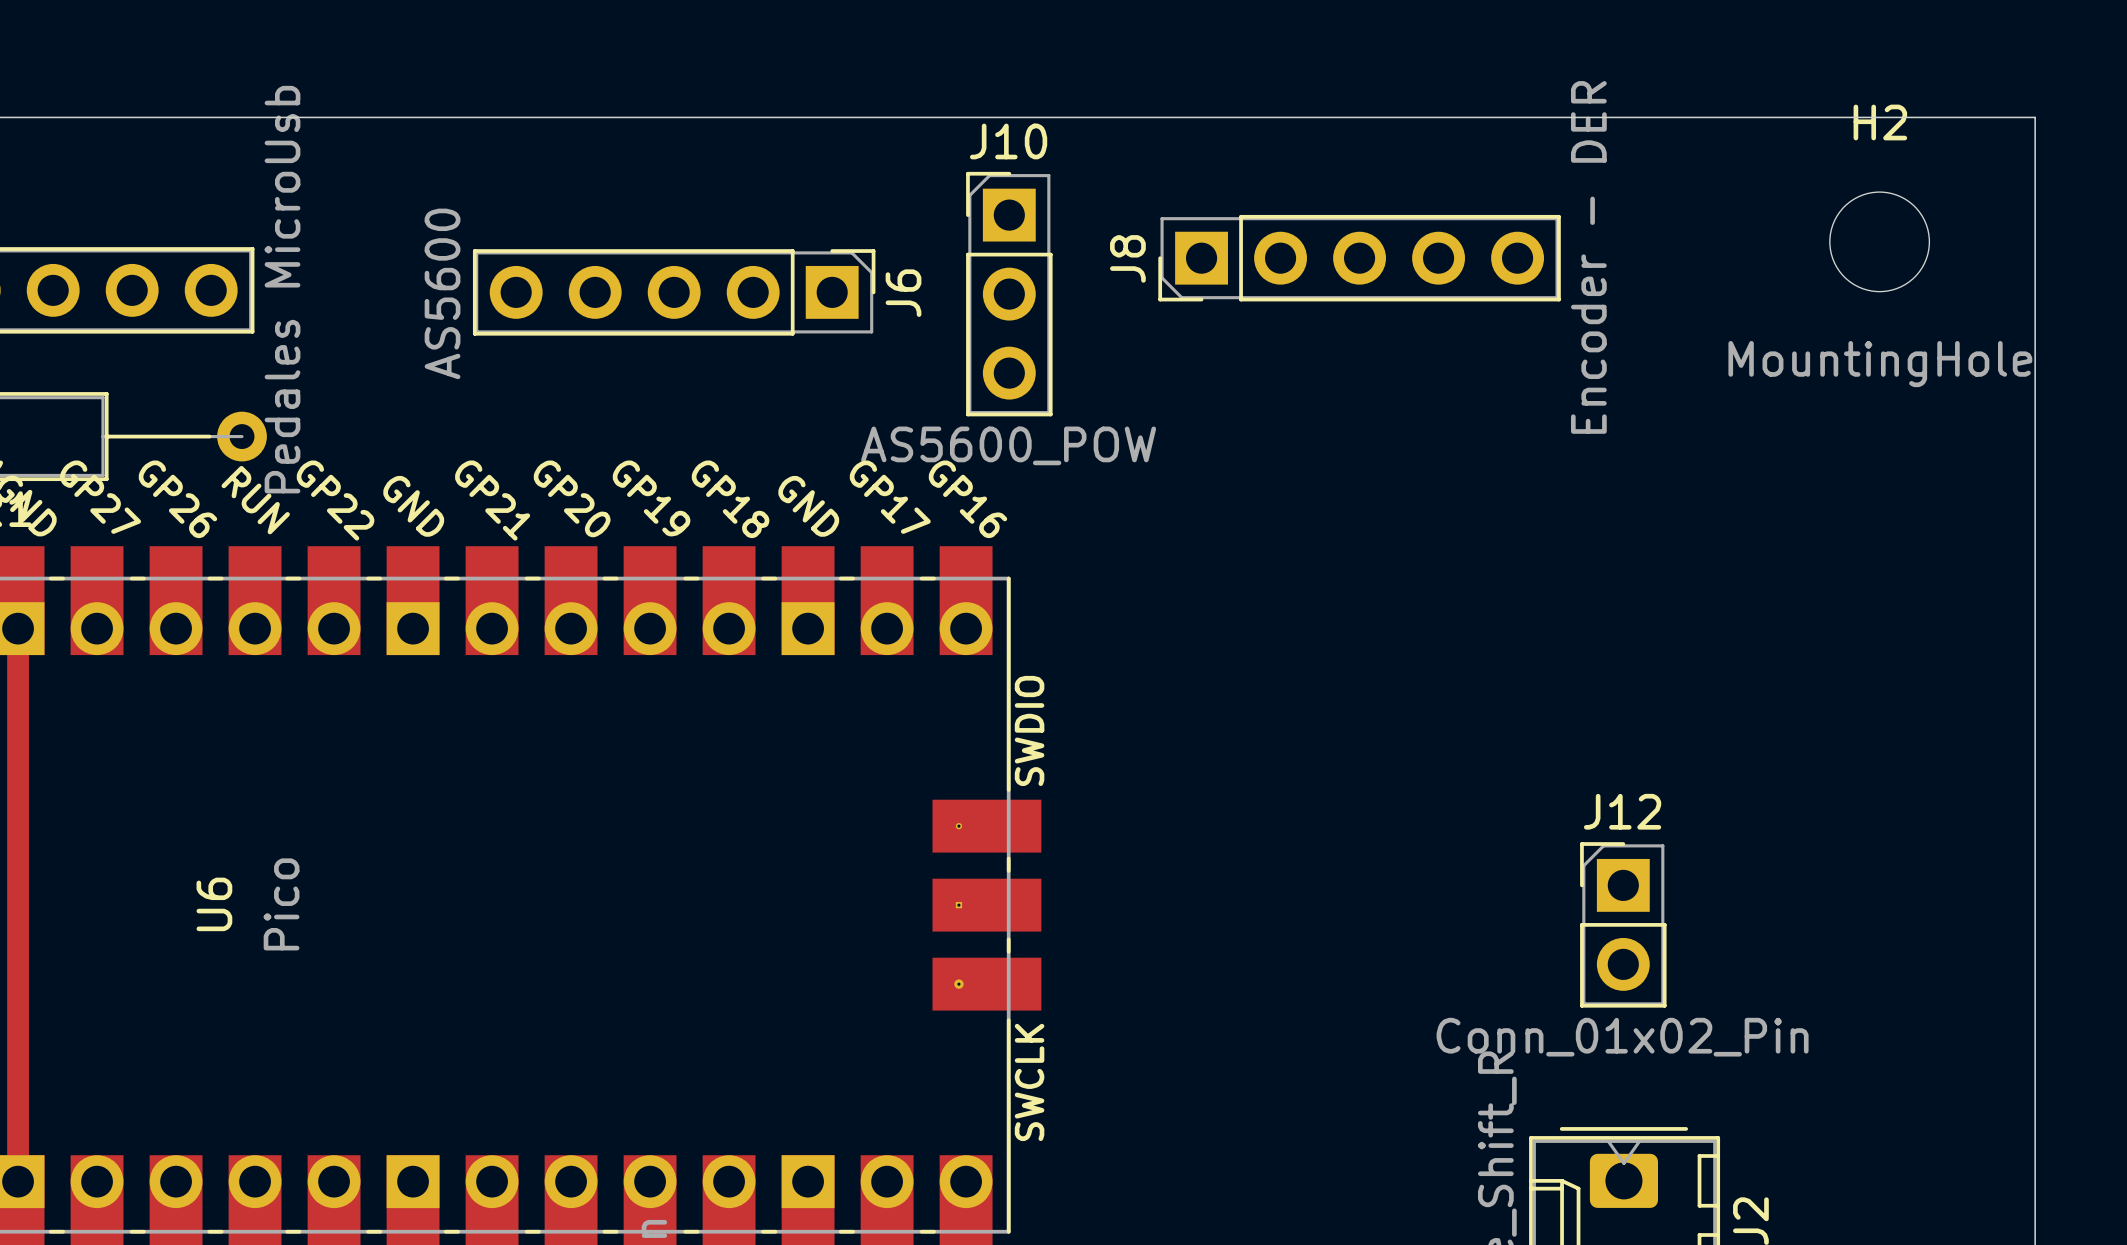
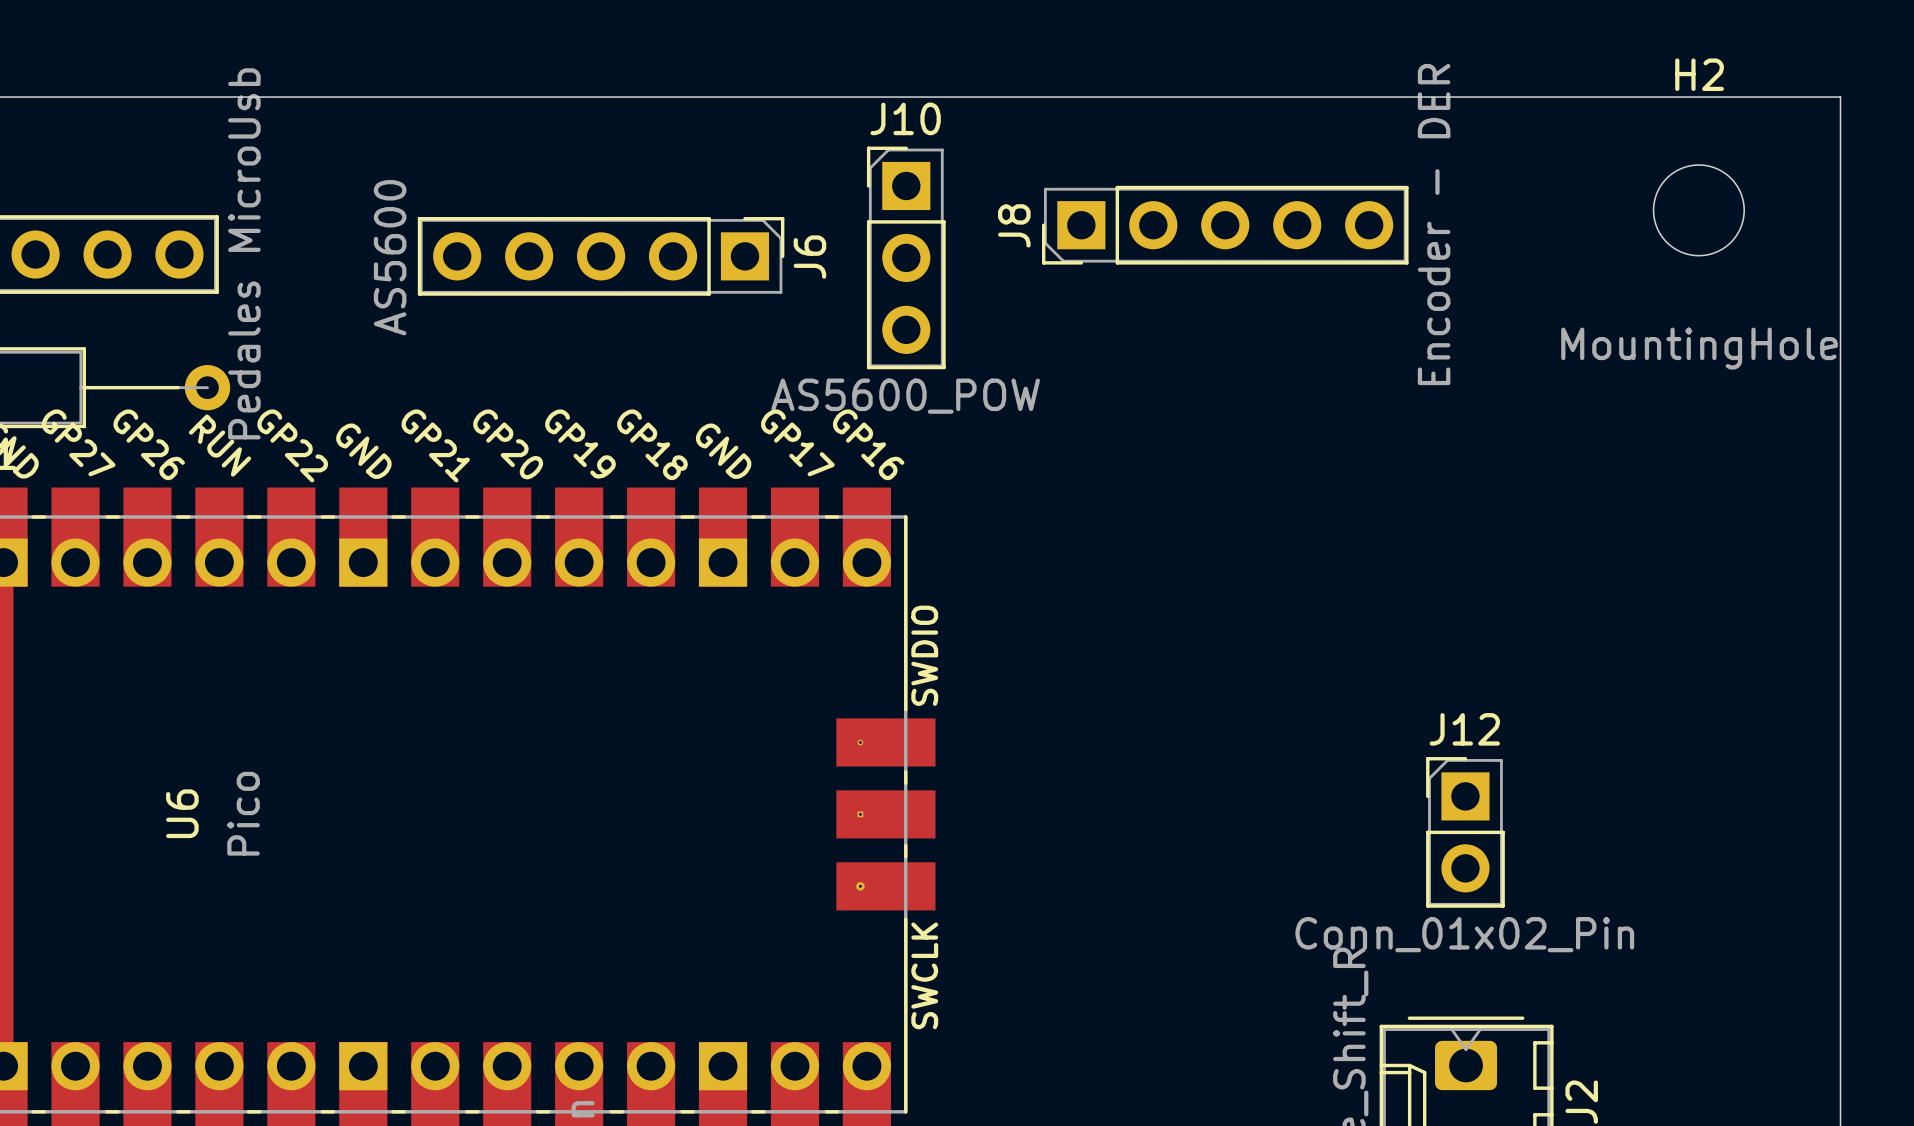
H2 name position: H2 (1880, 122) -> H2 (1699, 74)
H2 value position: MountingHole (1880, 364) -> MountingHole (1699, 348)

